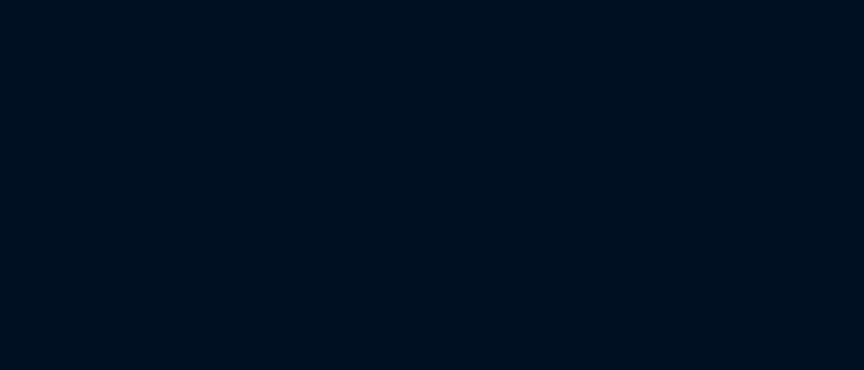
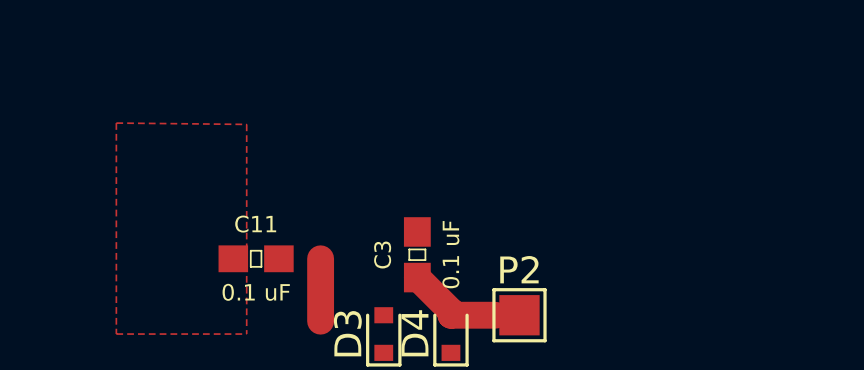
top zone outline: none -> (116, 123) (116, 334) (246, 334) (246, 124) (116, 123)
C3: none -> 0.1 uF (417, 254)
C11: none -> 0.1 uF (256, 258)
top track: none -> (320, 258) (320, 321)
top track: none -> (417, 277) (450, 311) (450, 315) (495, 315)
P2: none -> (519, 315)
D3: none -> (383, 336)
D4: none -> (450, 336)

